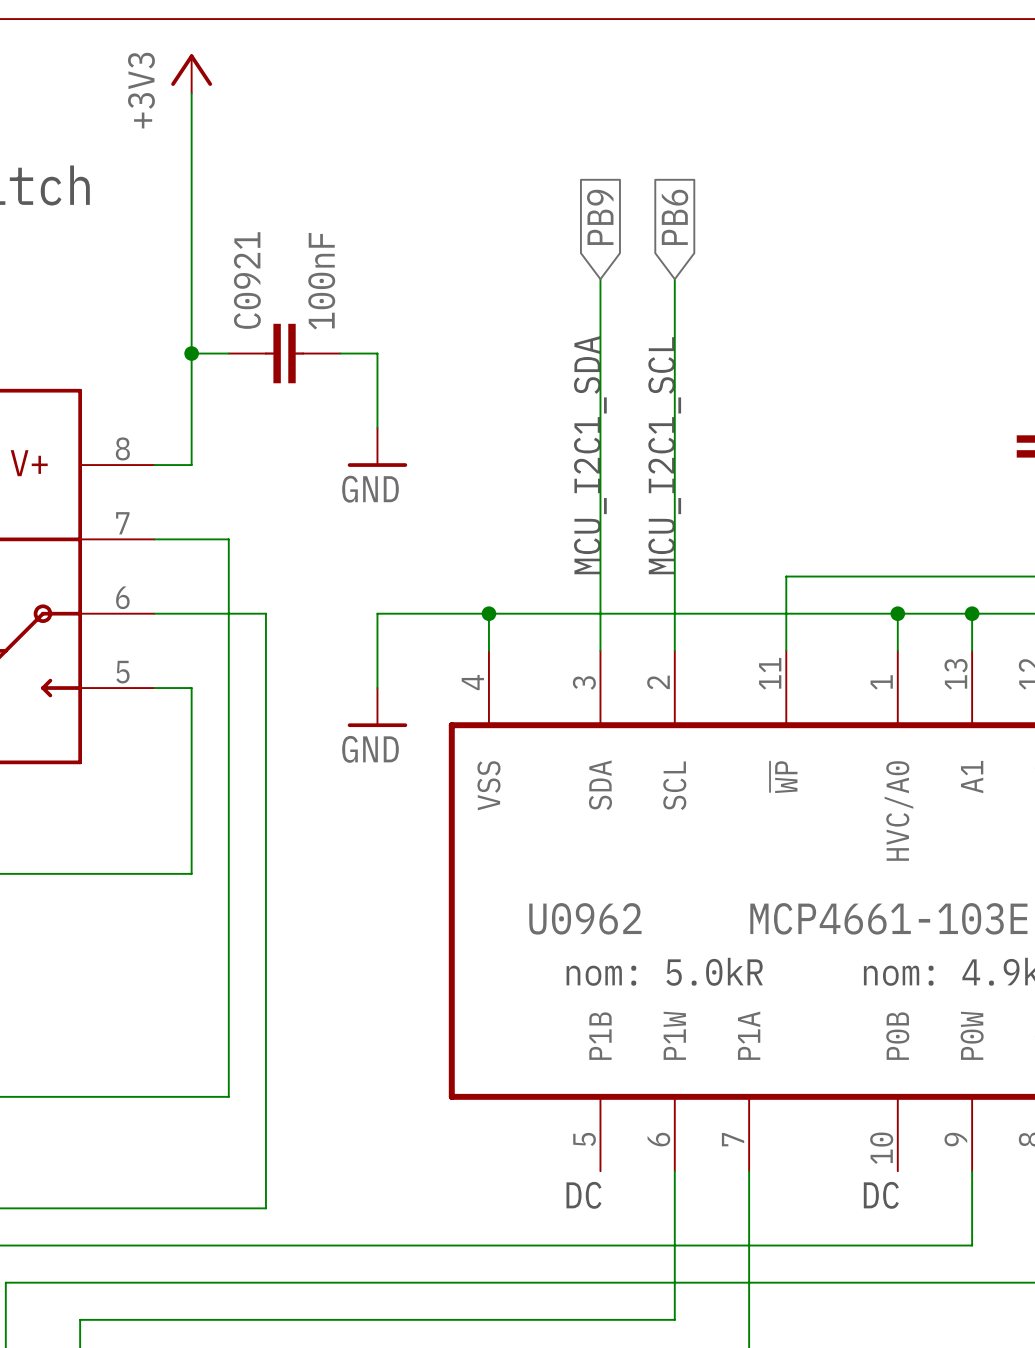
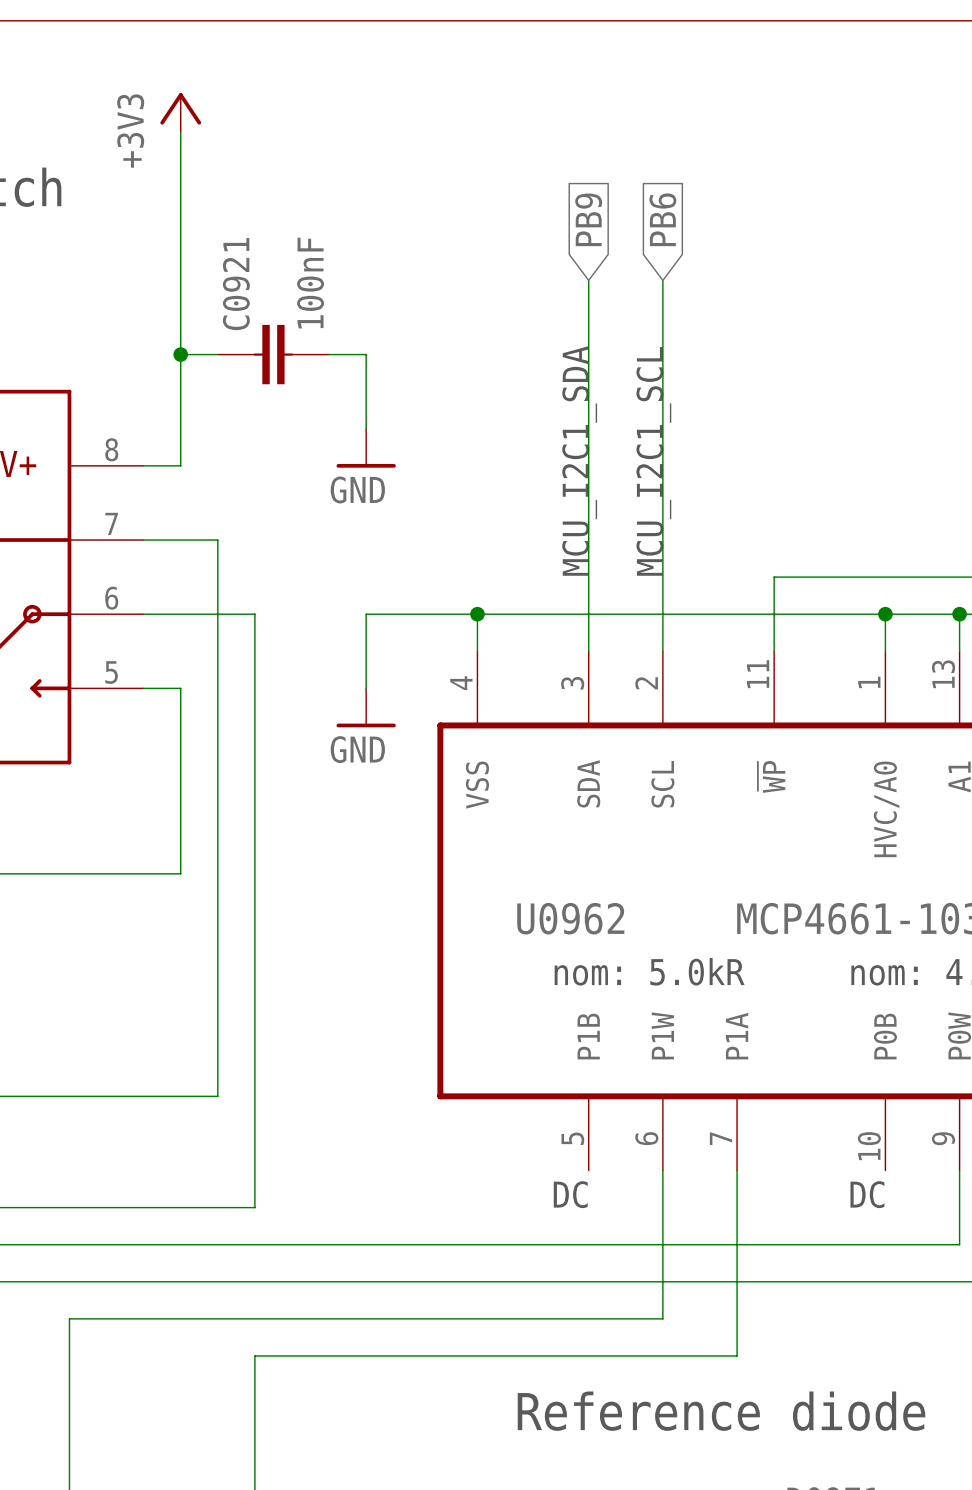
power symbol position: +3V3 (191, 73) -> +3V3 (180, 112)

